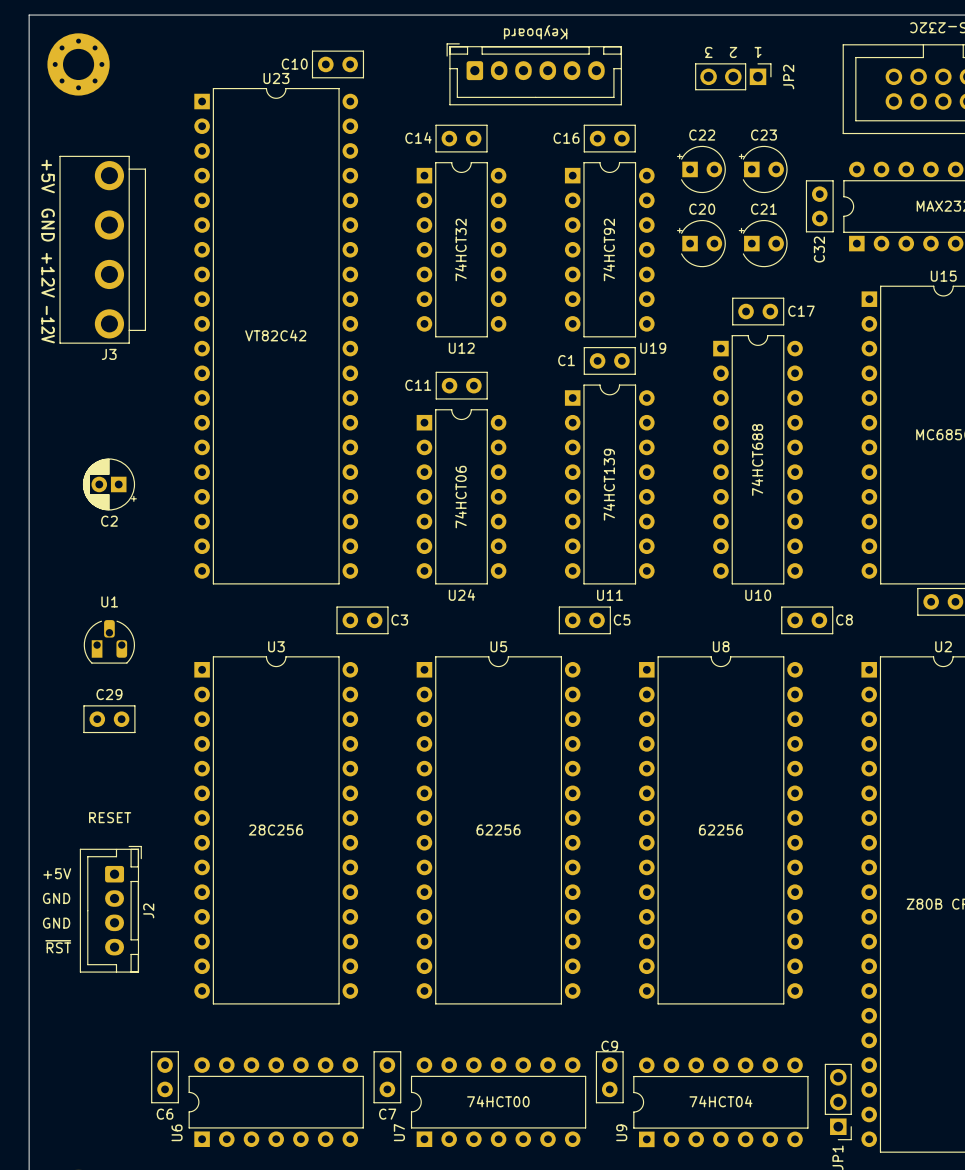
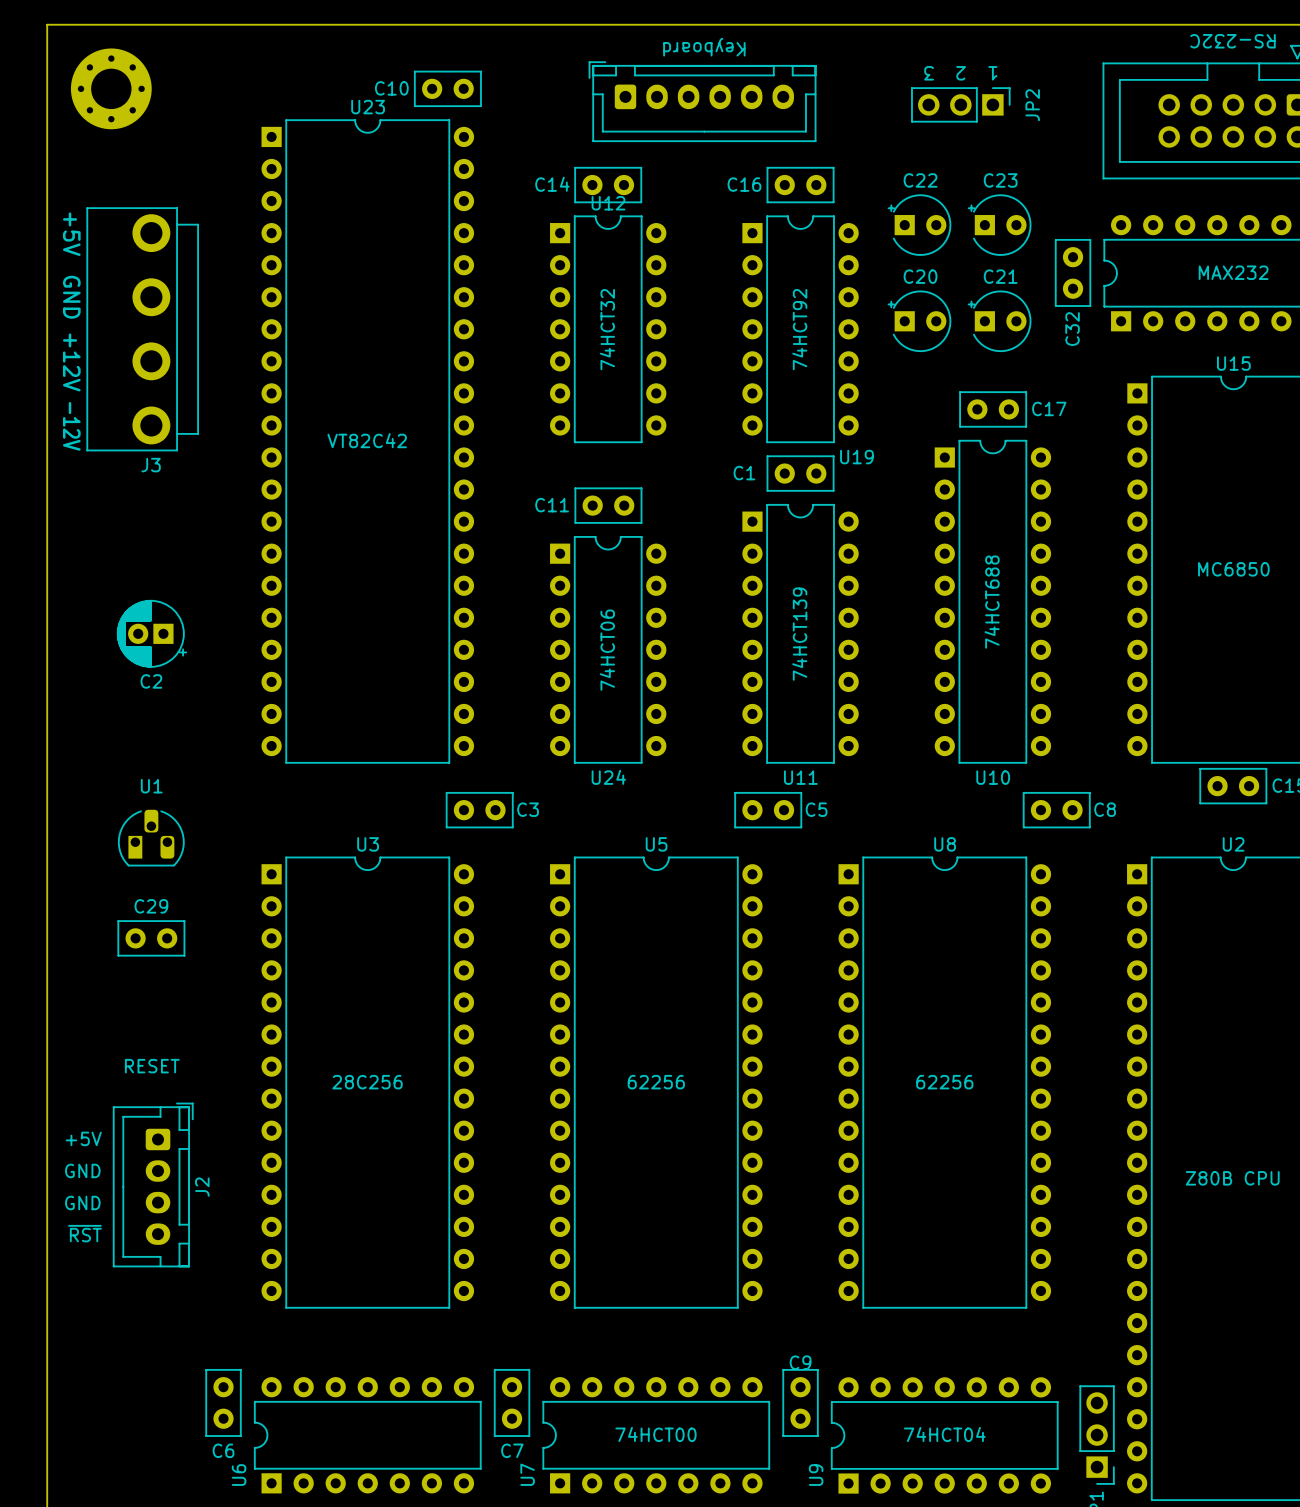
U12 name position: U12 (461, 348) -> U12 (608, 203)

